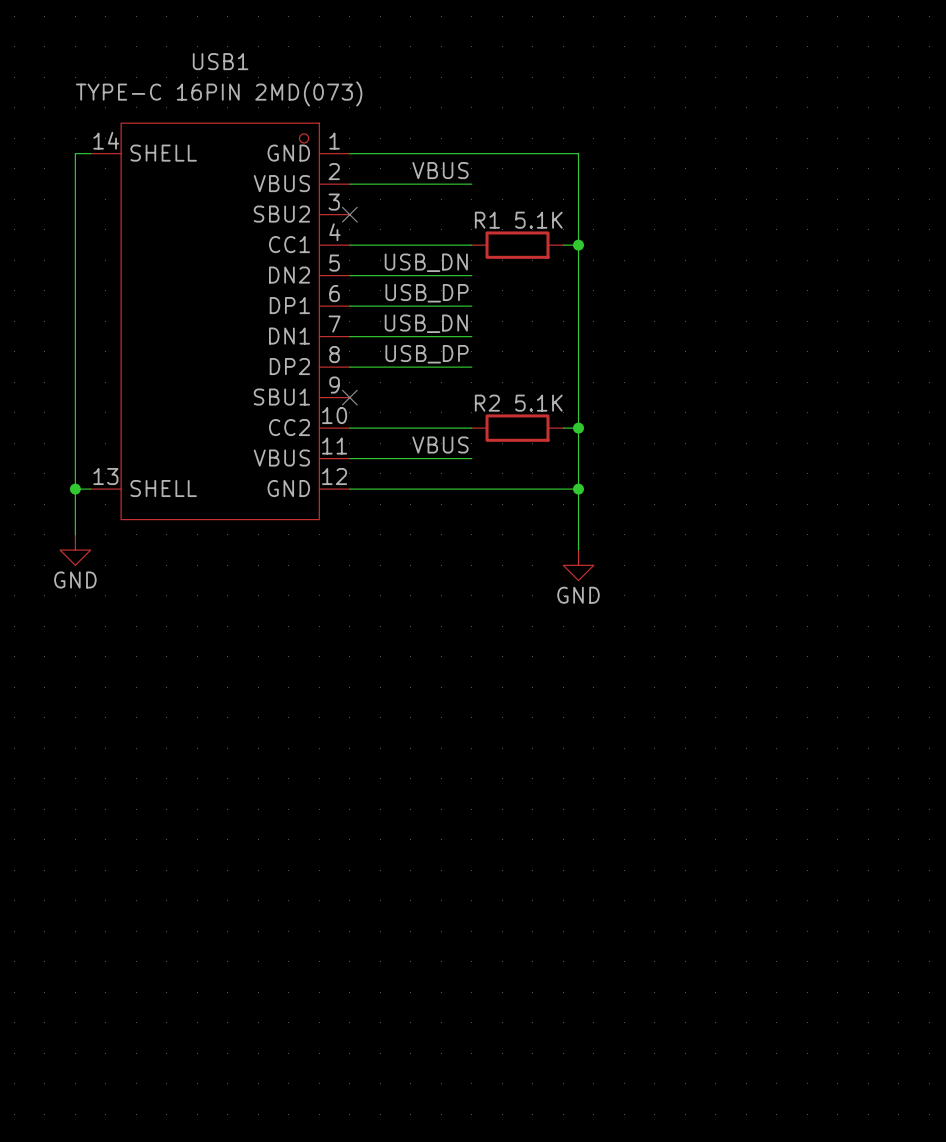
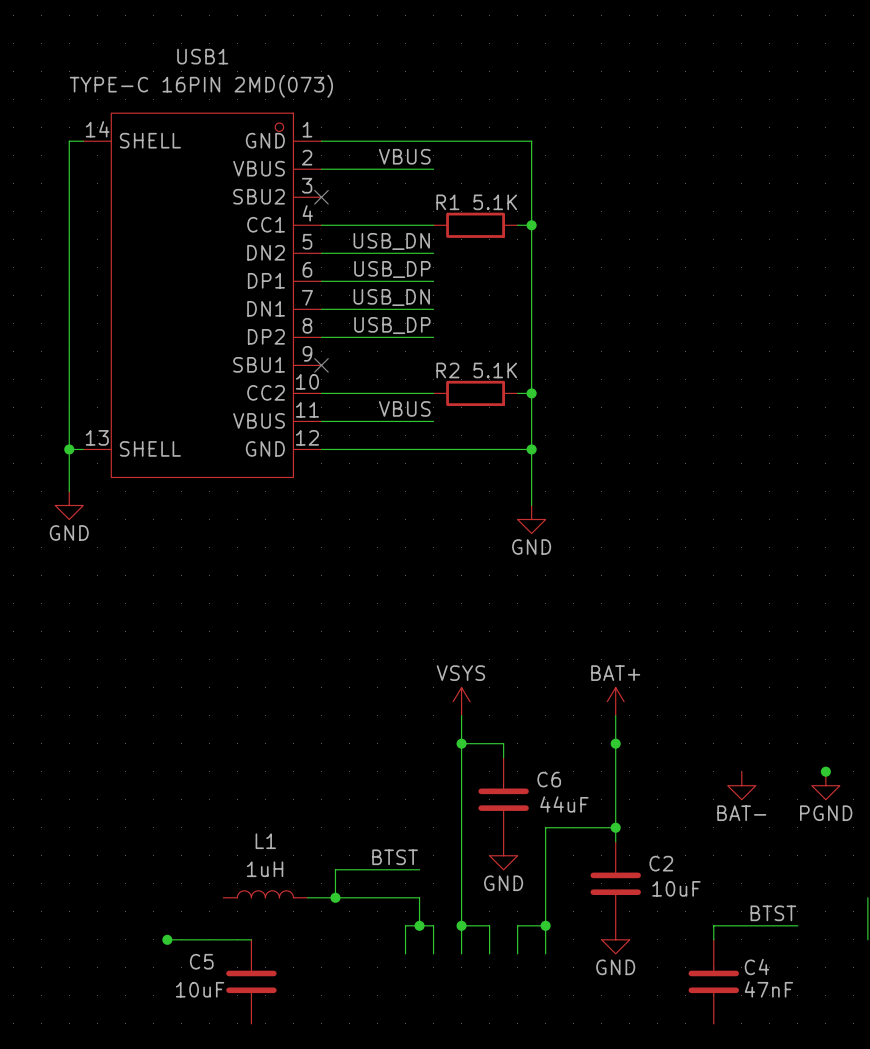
power symbol: none -> VSYS (461, 701)
power symbol: none -> BAT+ (615, 701)
wire: none -> (461, 715) (461, 953)
wire: none -> (615, 715) (615, 841)
wire: none -> (461, 743) (503, 743) (503, 757)
junction: none -> (461, 743)
junction: none -> (615, 743)
junction: none -> (825, 771)
power symbol: none -> BAT- (741, 785)
power symbol: none -> PGND (825, 785)
C6: none -> 44uF (503, 799)
wire: none -> (615, 827) (545, 827) (545, 953)
junction: none -> (615, 827)
power symbol: none -> GND (503, 855)
label: none -> BTST (395, 857)
wire: none -> (419, 869) (335, 869) (335, 897)
C2: none -> 10uF (615, 883)
L1: none -> 1uH (265, 894)
wire: none -> (307, 897) (419, 897) (419, 925)
junction: none -> (335, 897)
wire: none -> (867, 897) (867, 939)
label: none -> BTST (773, 913)
junction: none -> (419, 925)
wire: none -> (461, 925) (489, 925) (489, 953)
junction: none -> (461, 925)
wire: none -> (545, 925) (517, 925) (517, 953)
junction: none -> (545, 925)
wire: none -> (797, 925) (713, 925) (713, 939)
wire: none -> (167, 939) (251, 939)
junction: none -> (167, 939)
power symbol: none -> GND (615, 939)
wire: none -> (405, 953) (405, 925) (433, 925) (433, 953)
C5: none -> 10uF (251, 981)
C4: none -> 47nF (713, 981)

